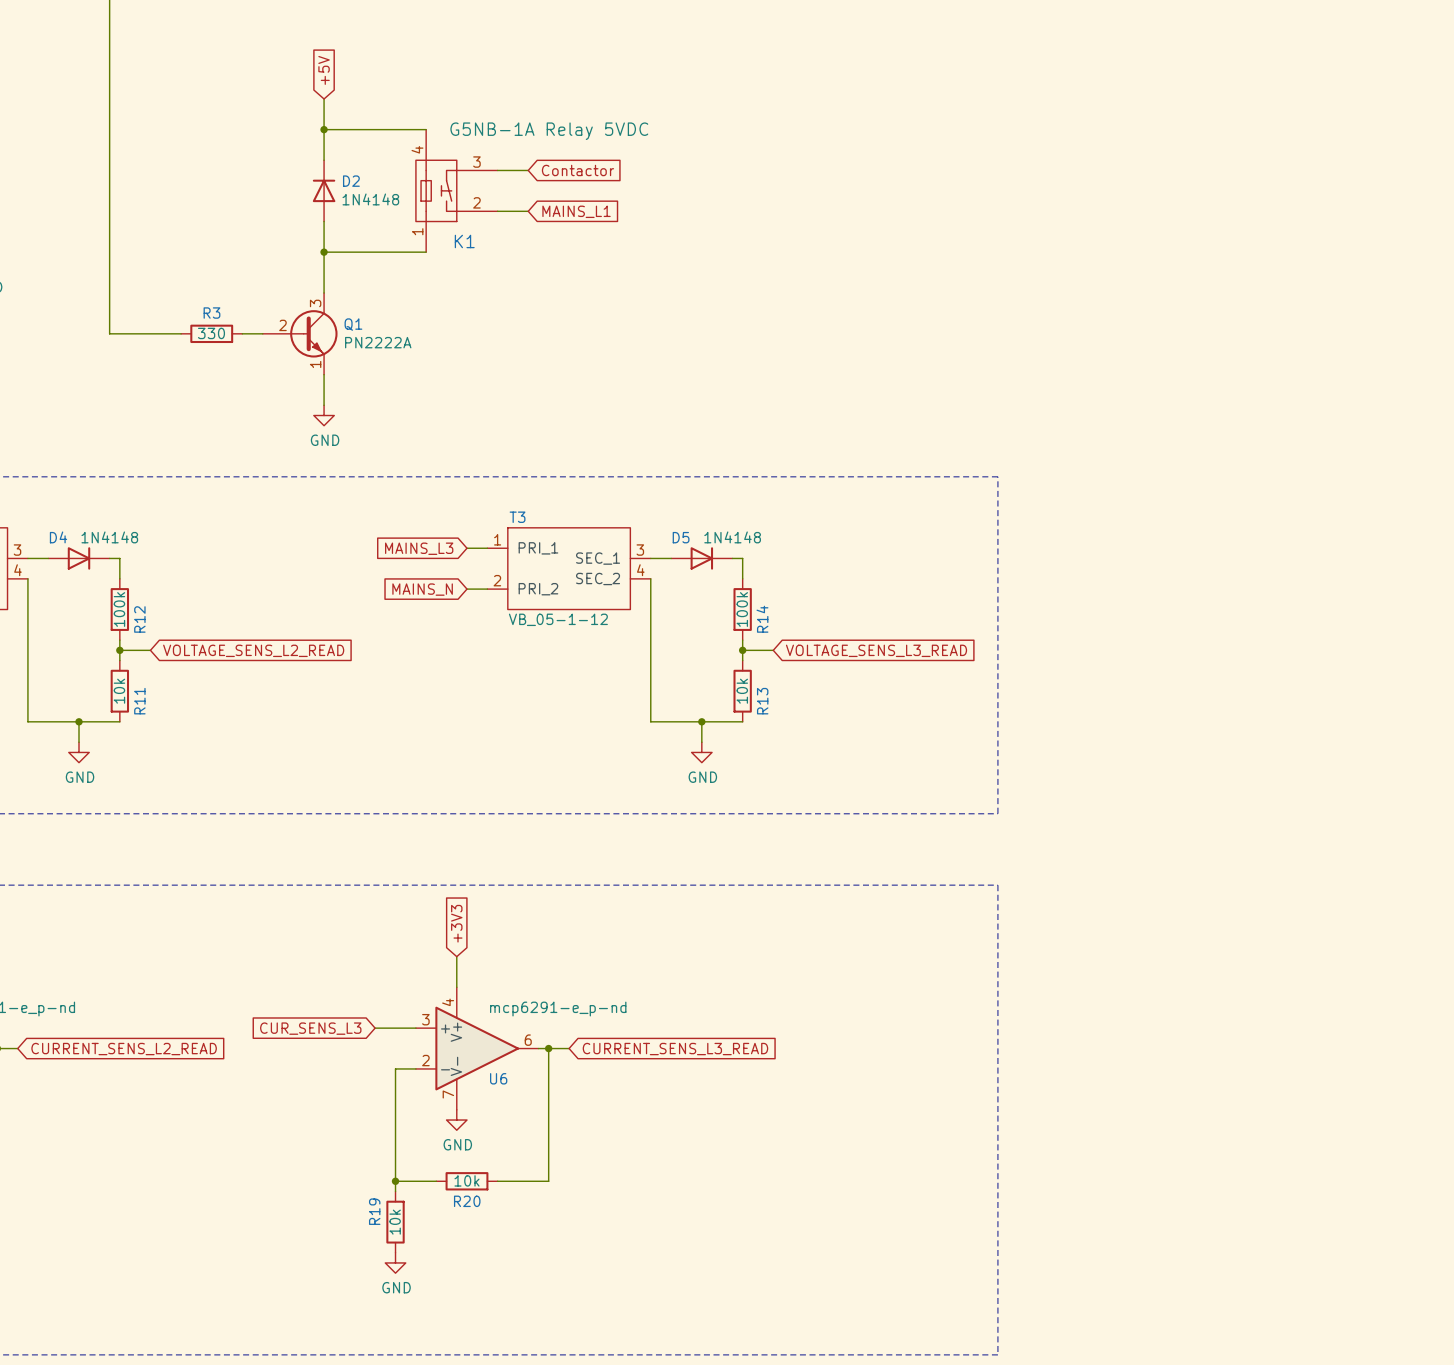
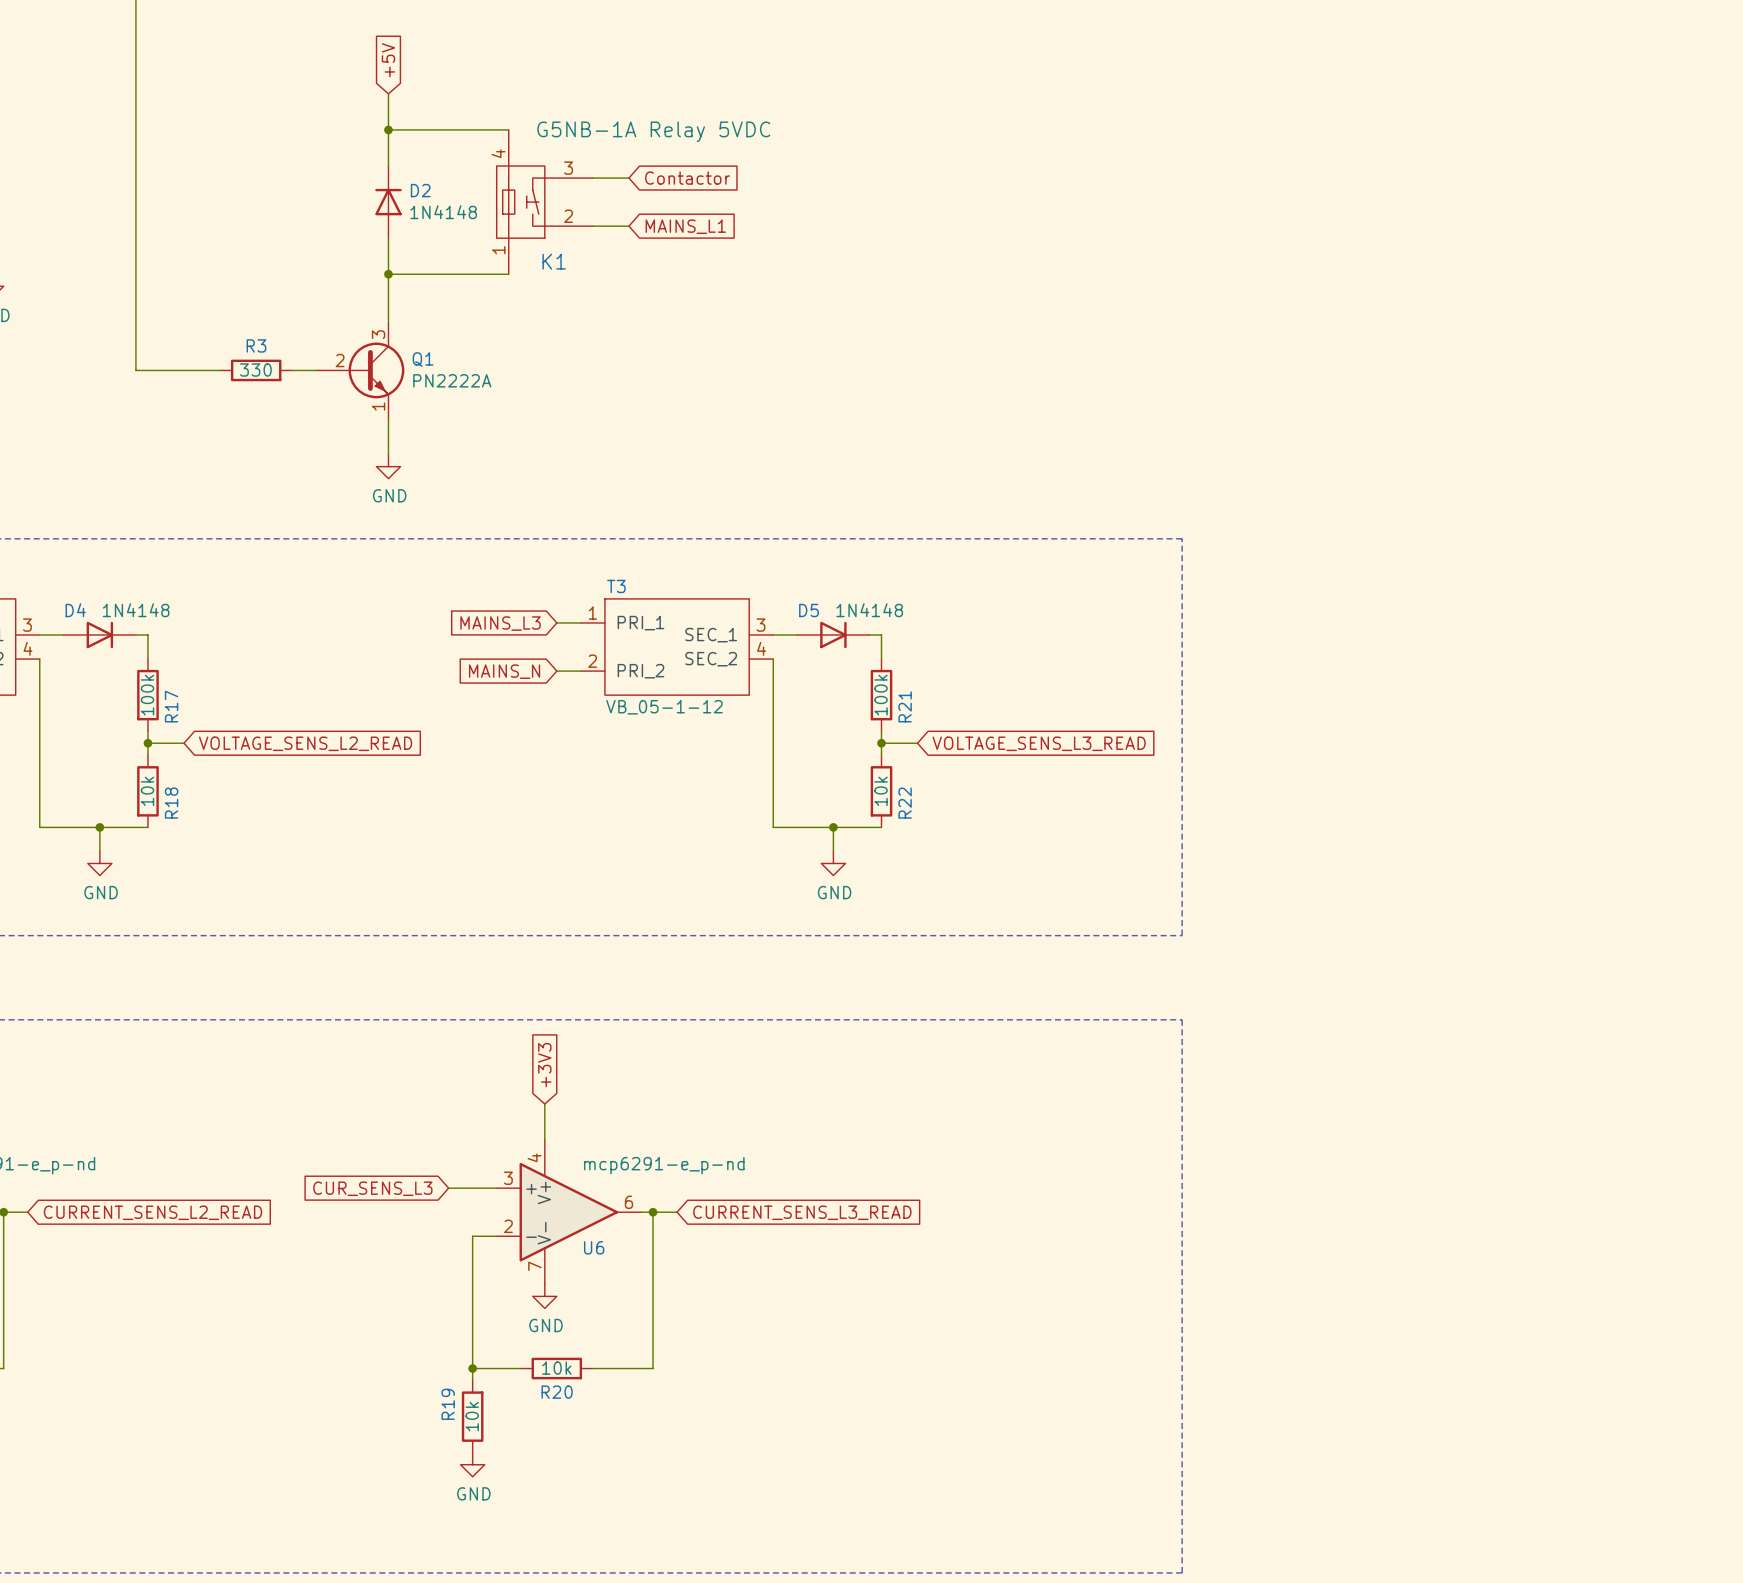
R12 name: R12 (139, 619) -> R17 (171, 706)
R14 name: R14 (762, 619) -> R21 (905, 706)
R11 name: R11 (139, 701) -> R18 (171, 803)
R13 name: R13 (762, 701) -> R22 (905, 803)

